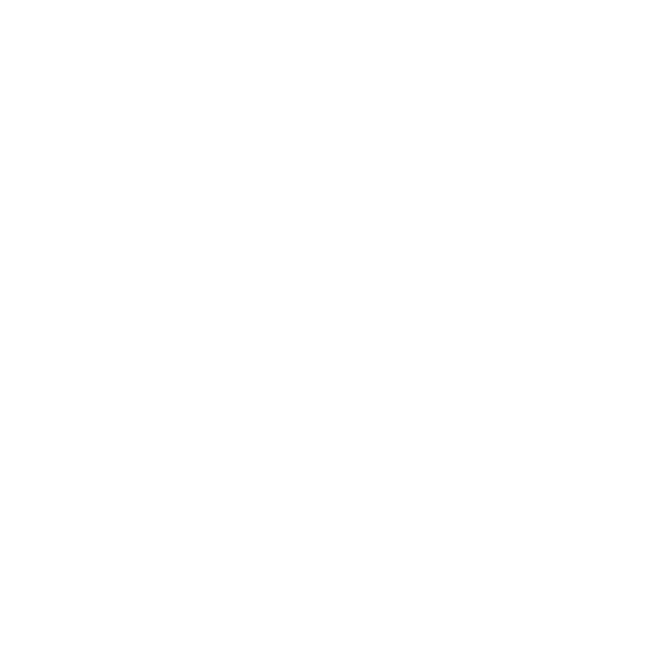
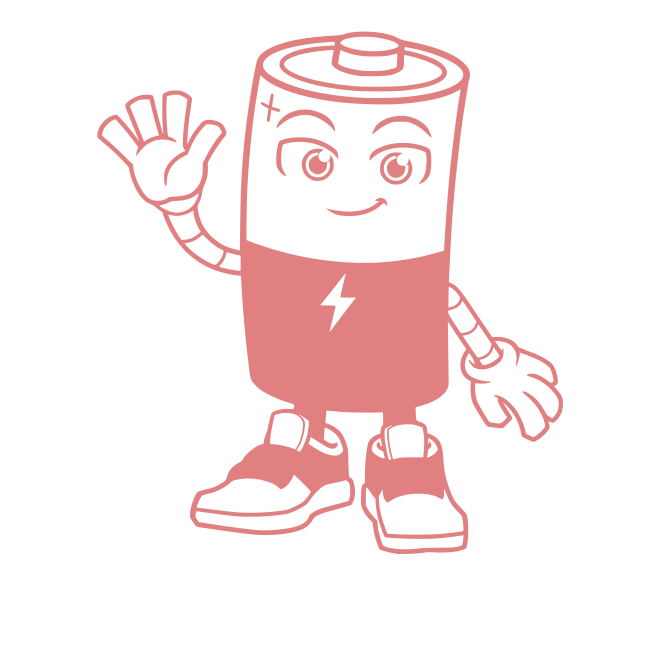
drawing: none -> [97, 31, 563, 554]

